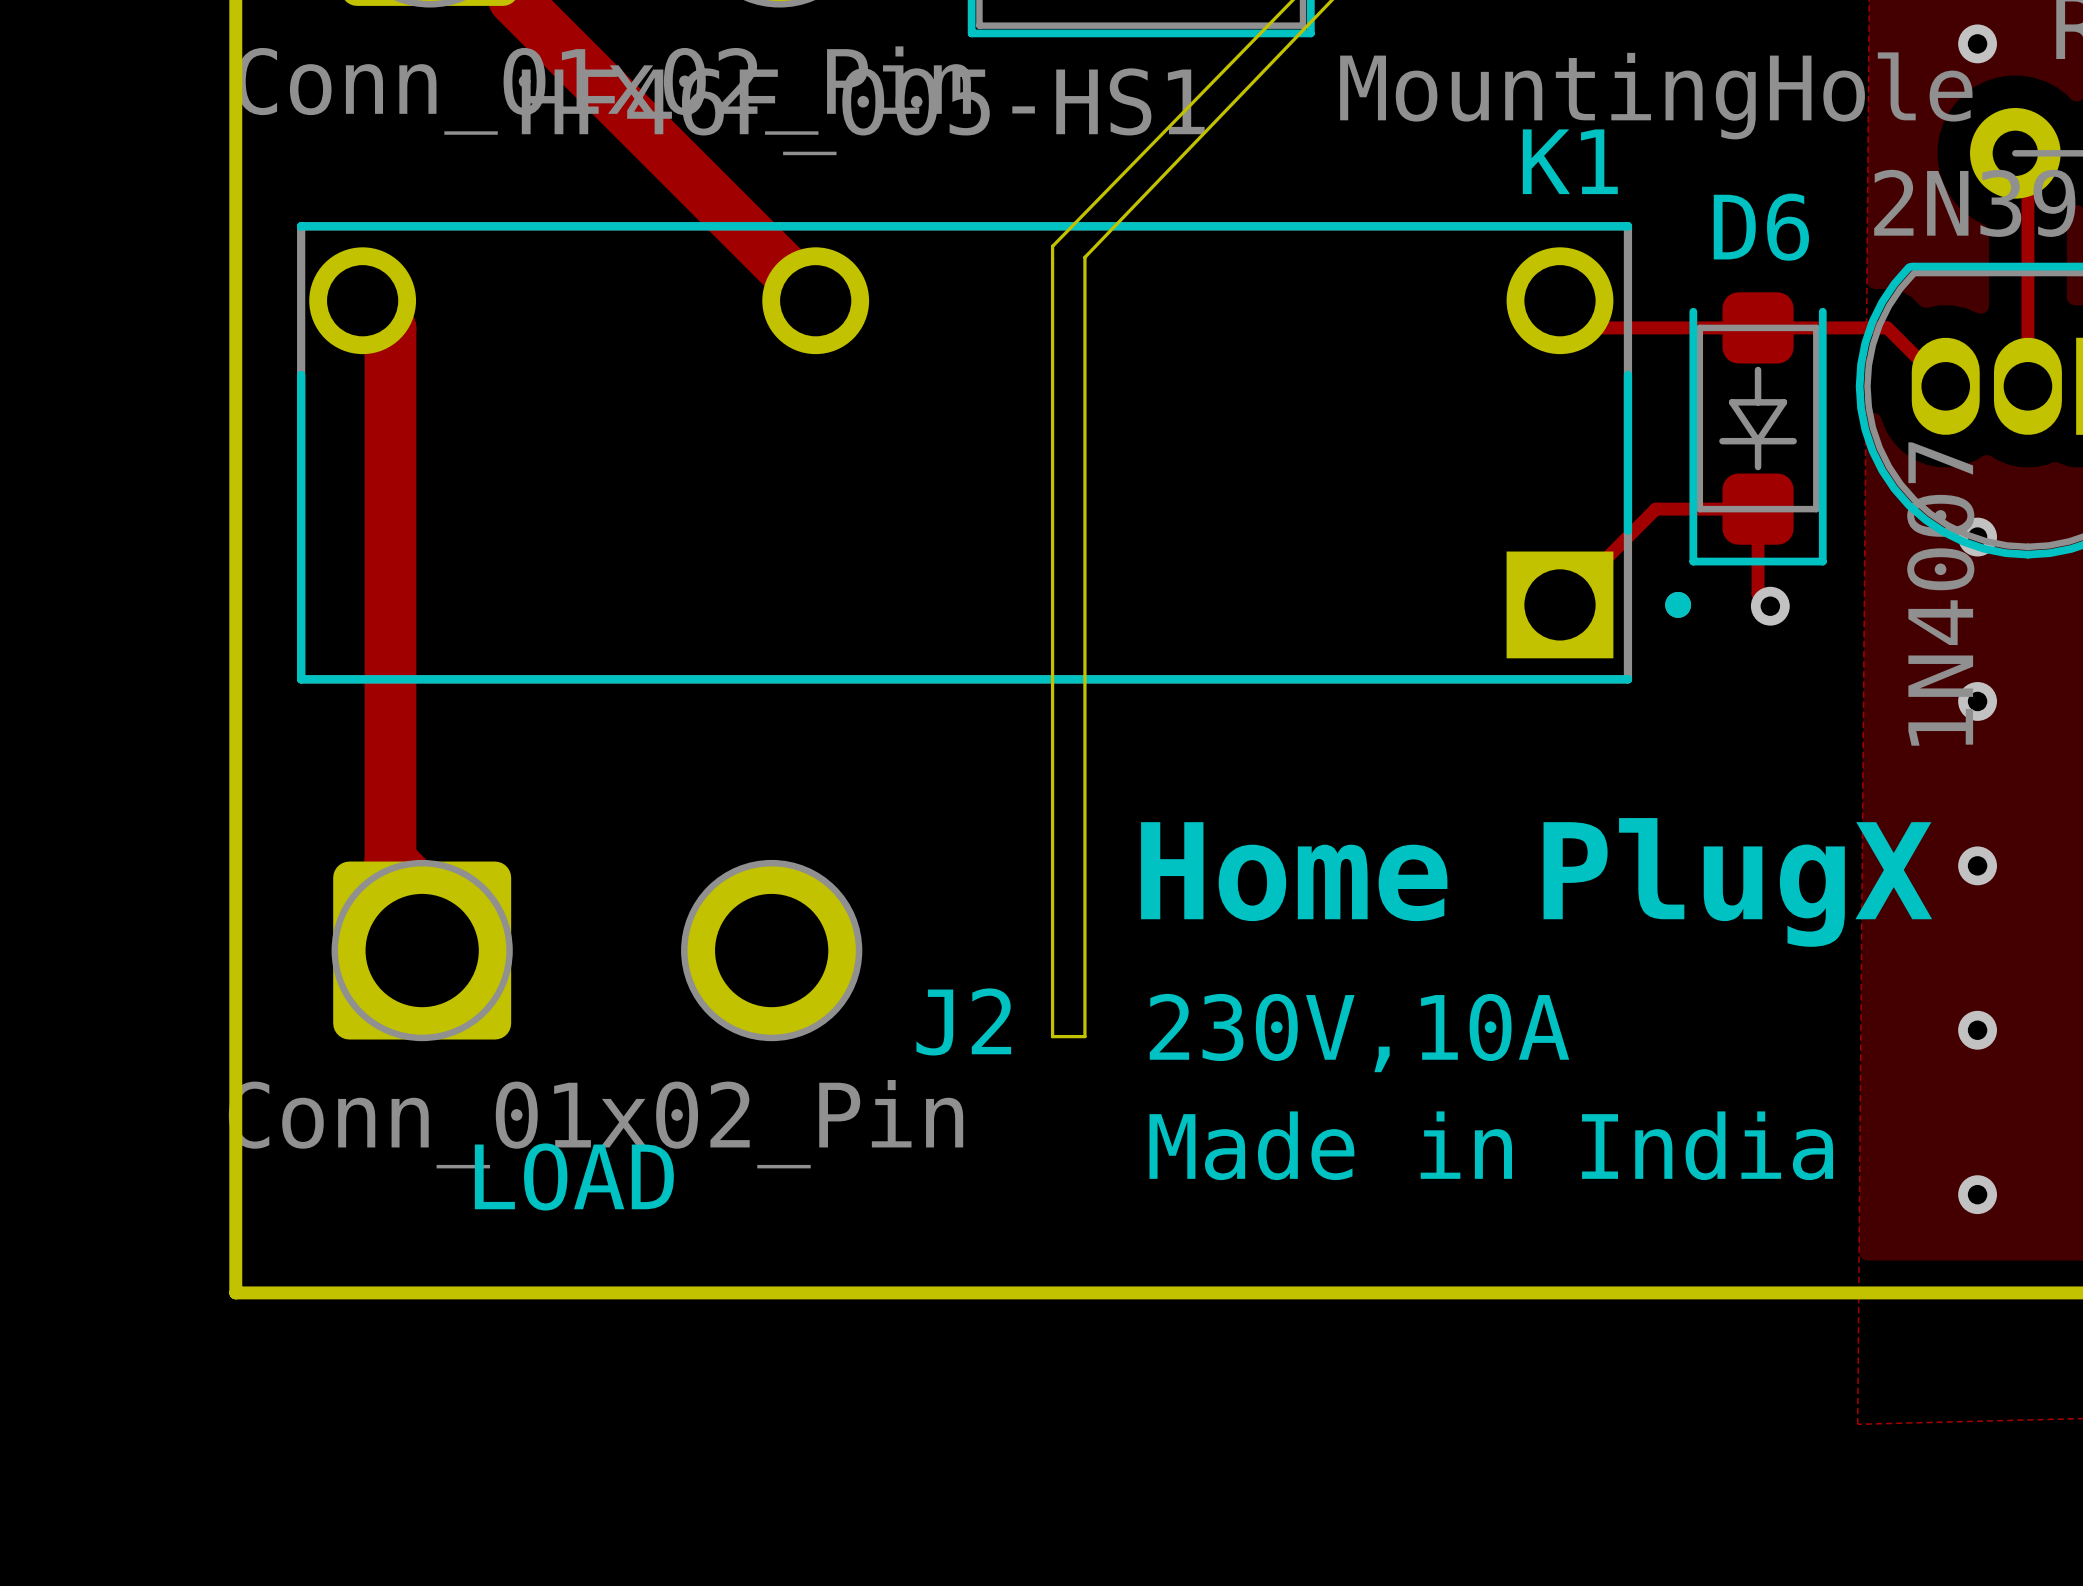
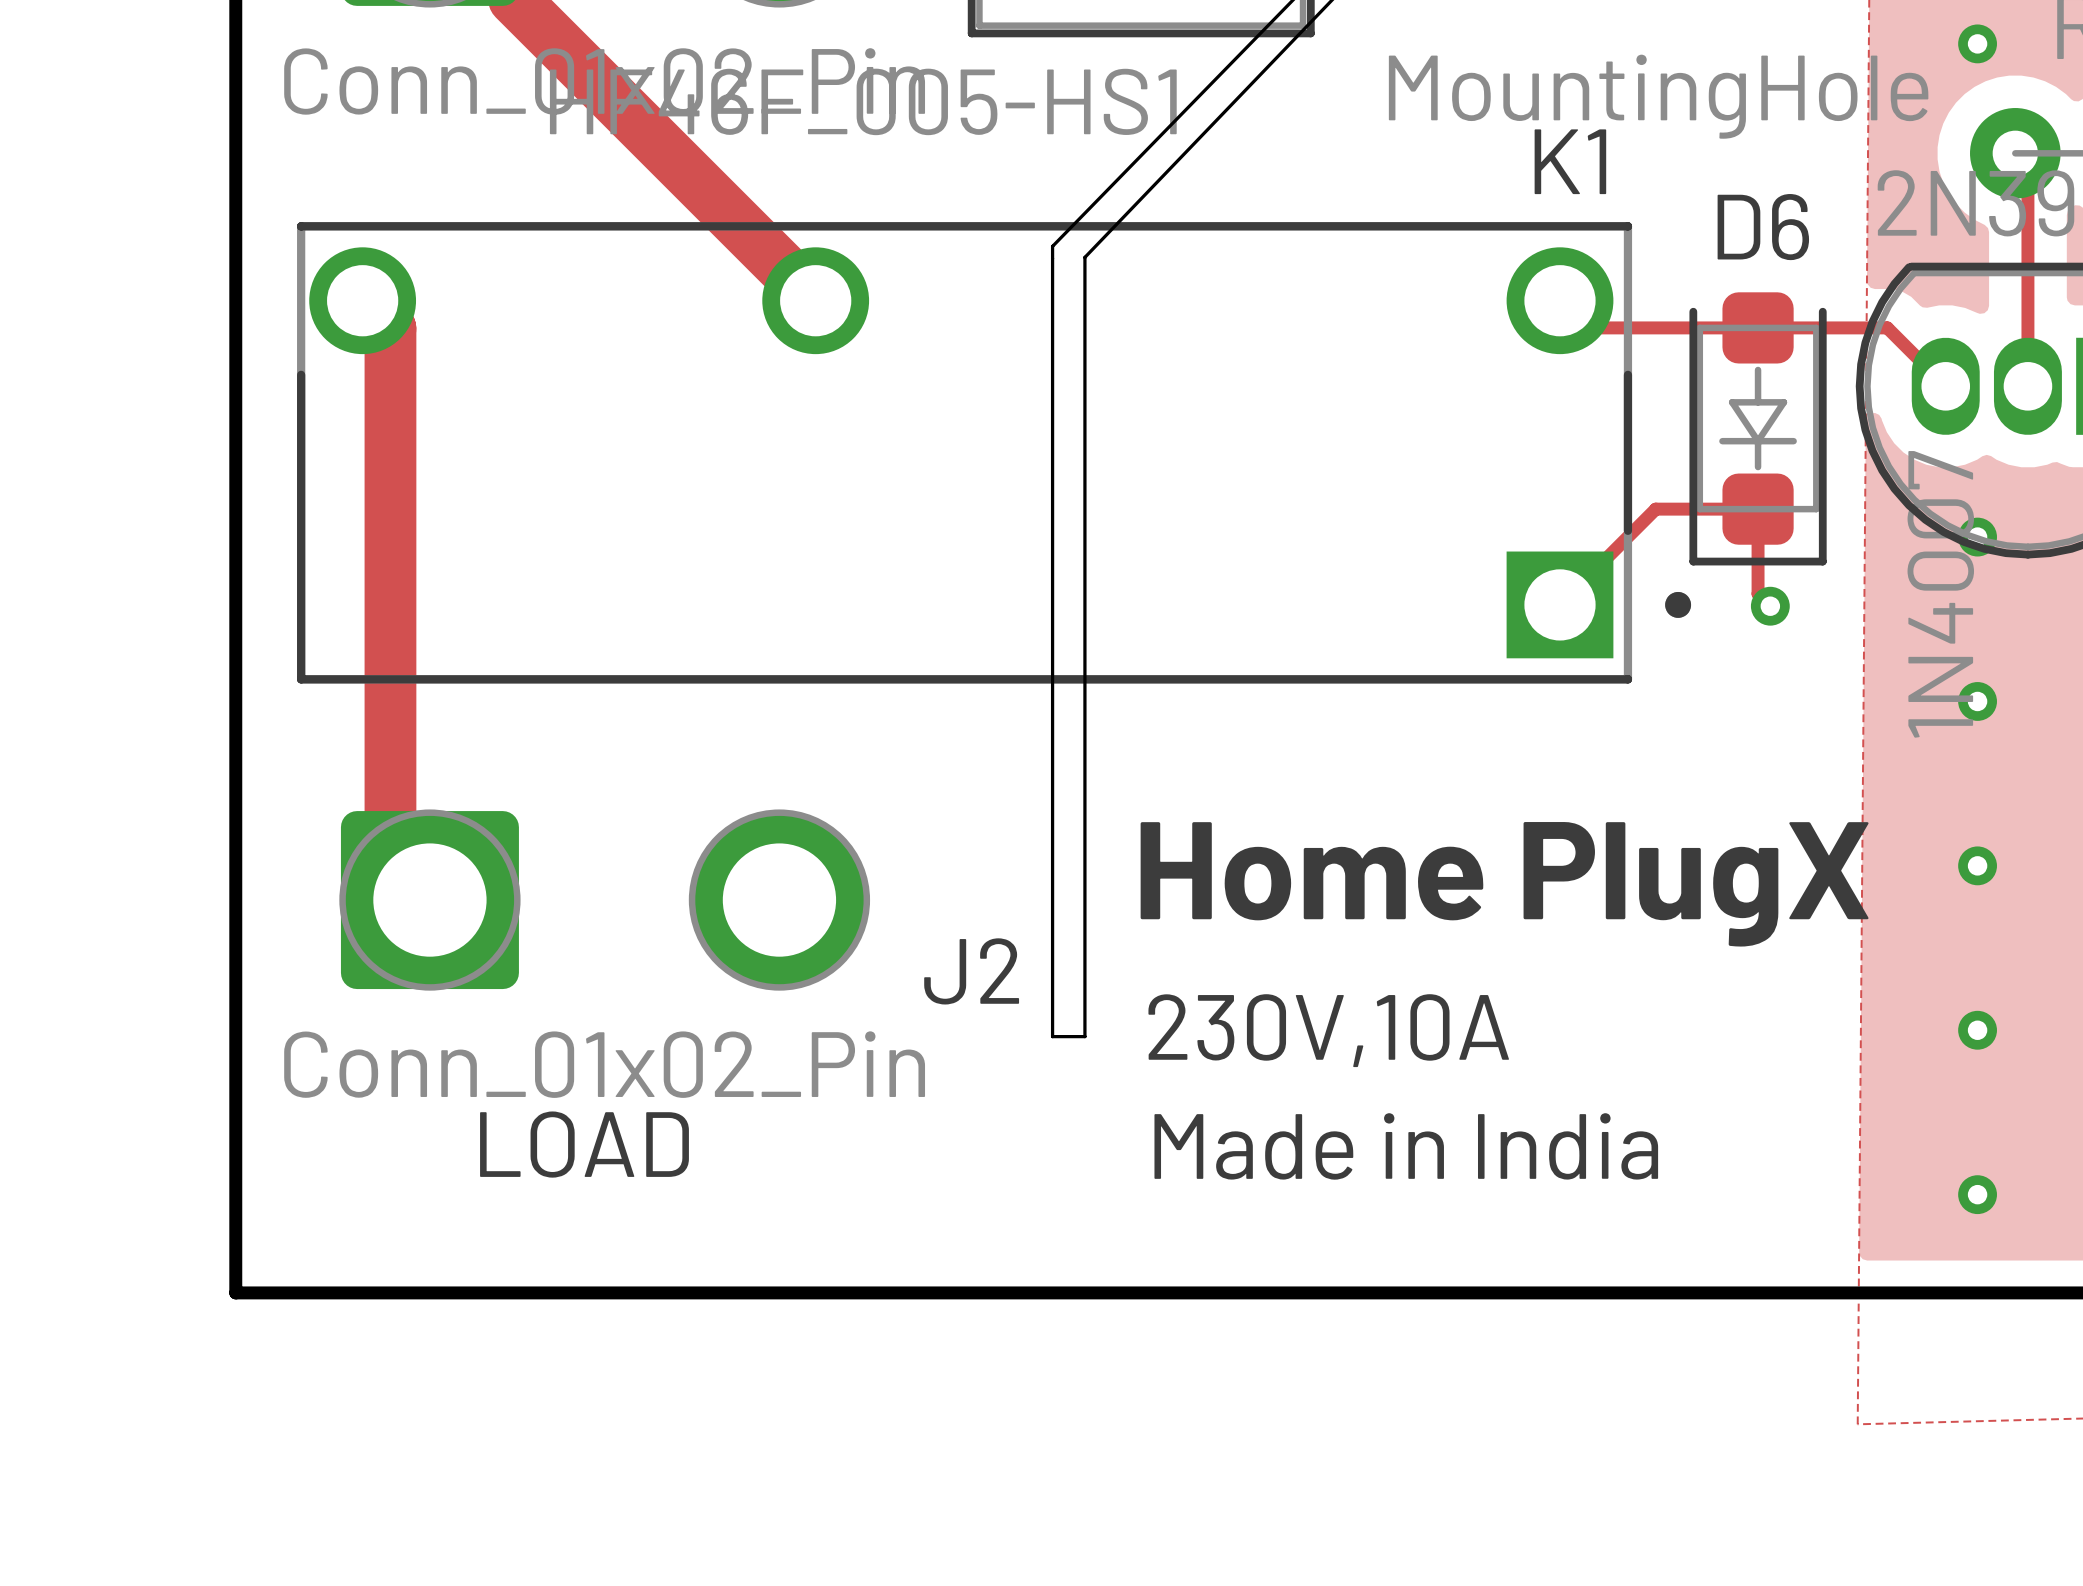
J2 position: (596, 950) -> (604, 900)
text position: LOAD (574, 1176) -> LOAD (584, 1144)

